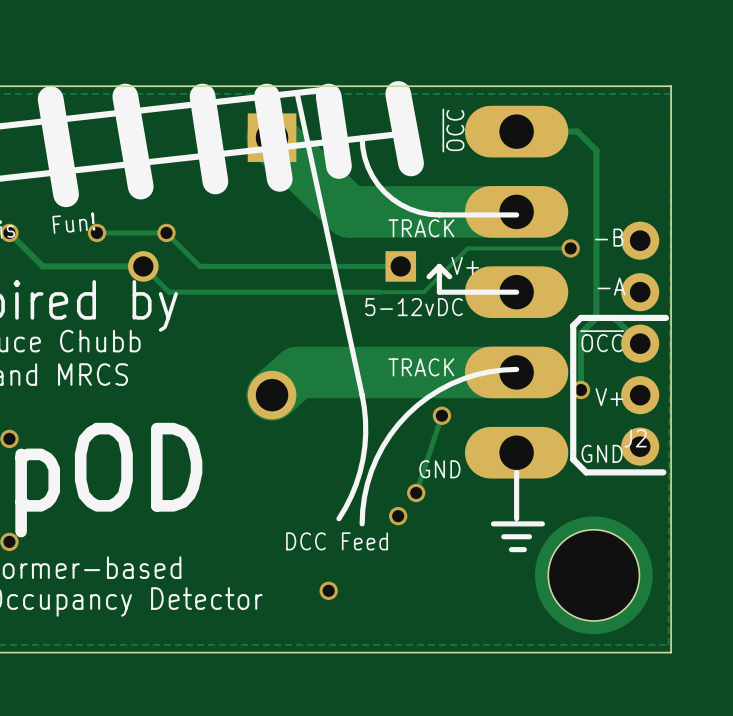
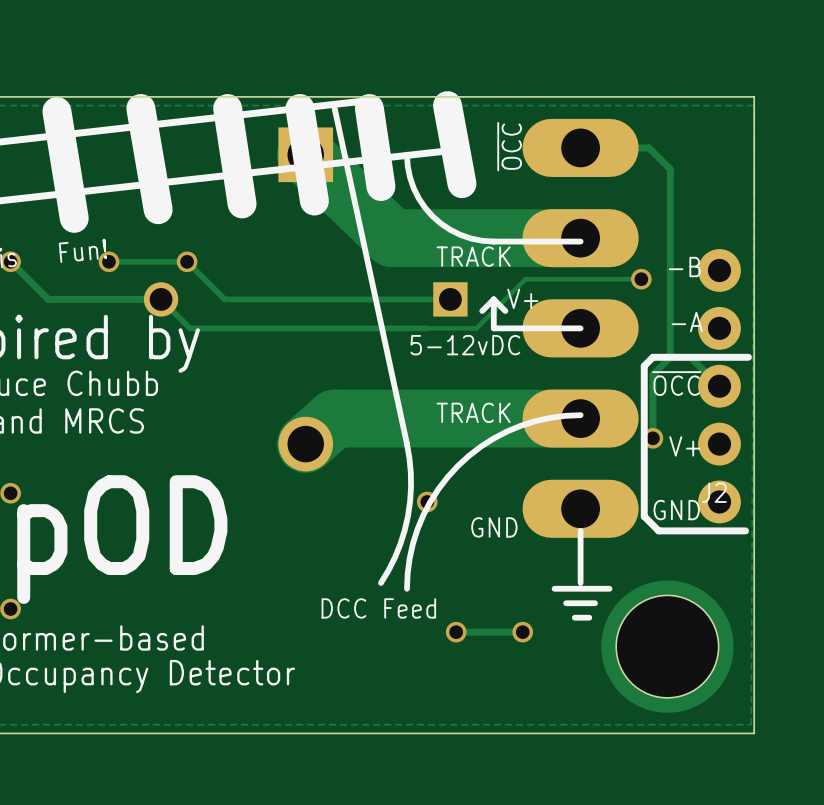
track: (441, 415) (416, 492) -> none
via: (441, 415) -> none
via: none -> (427, 501)
via: (416, 492) -> none
via: (398, 516) -> none
via: none -> (456, 632)
track: none -> (522, 632) (456, 632)
via: none -> (522, 632)
via: (328, 590) -> none

